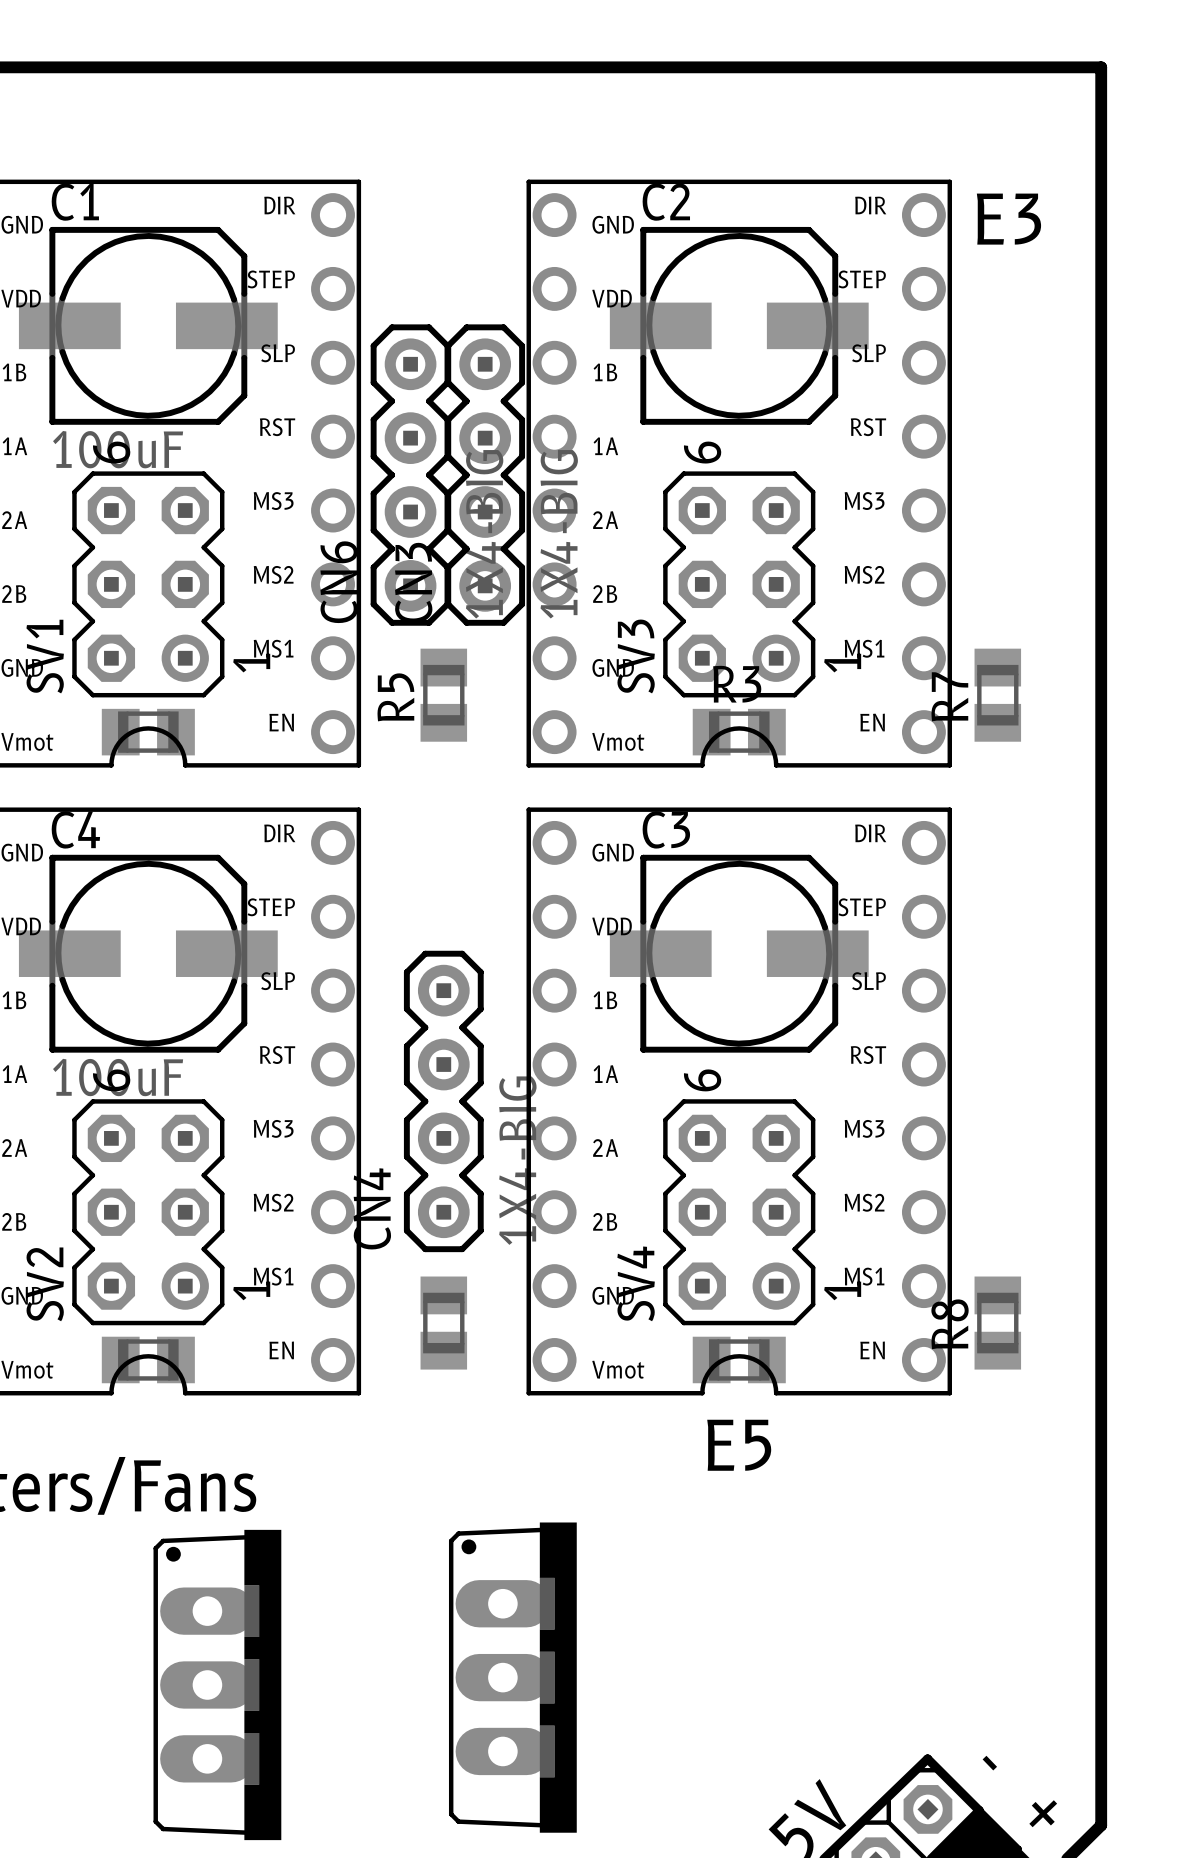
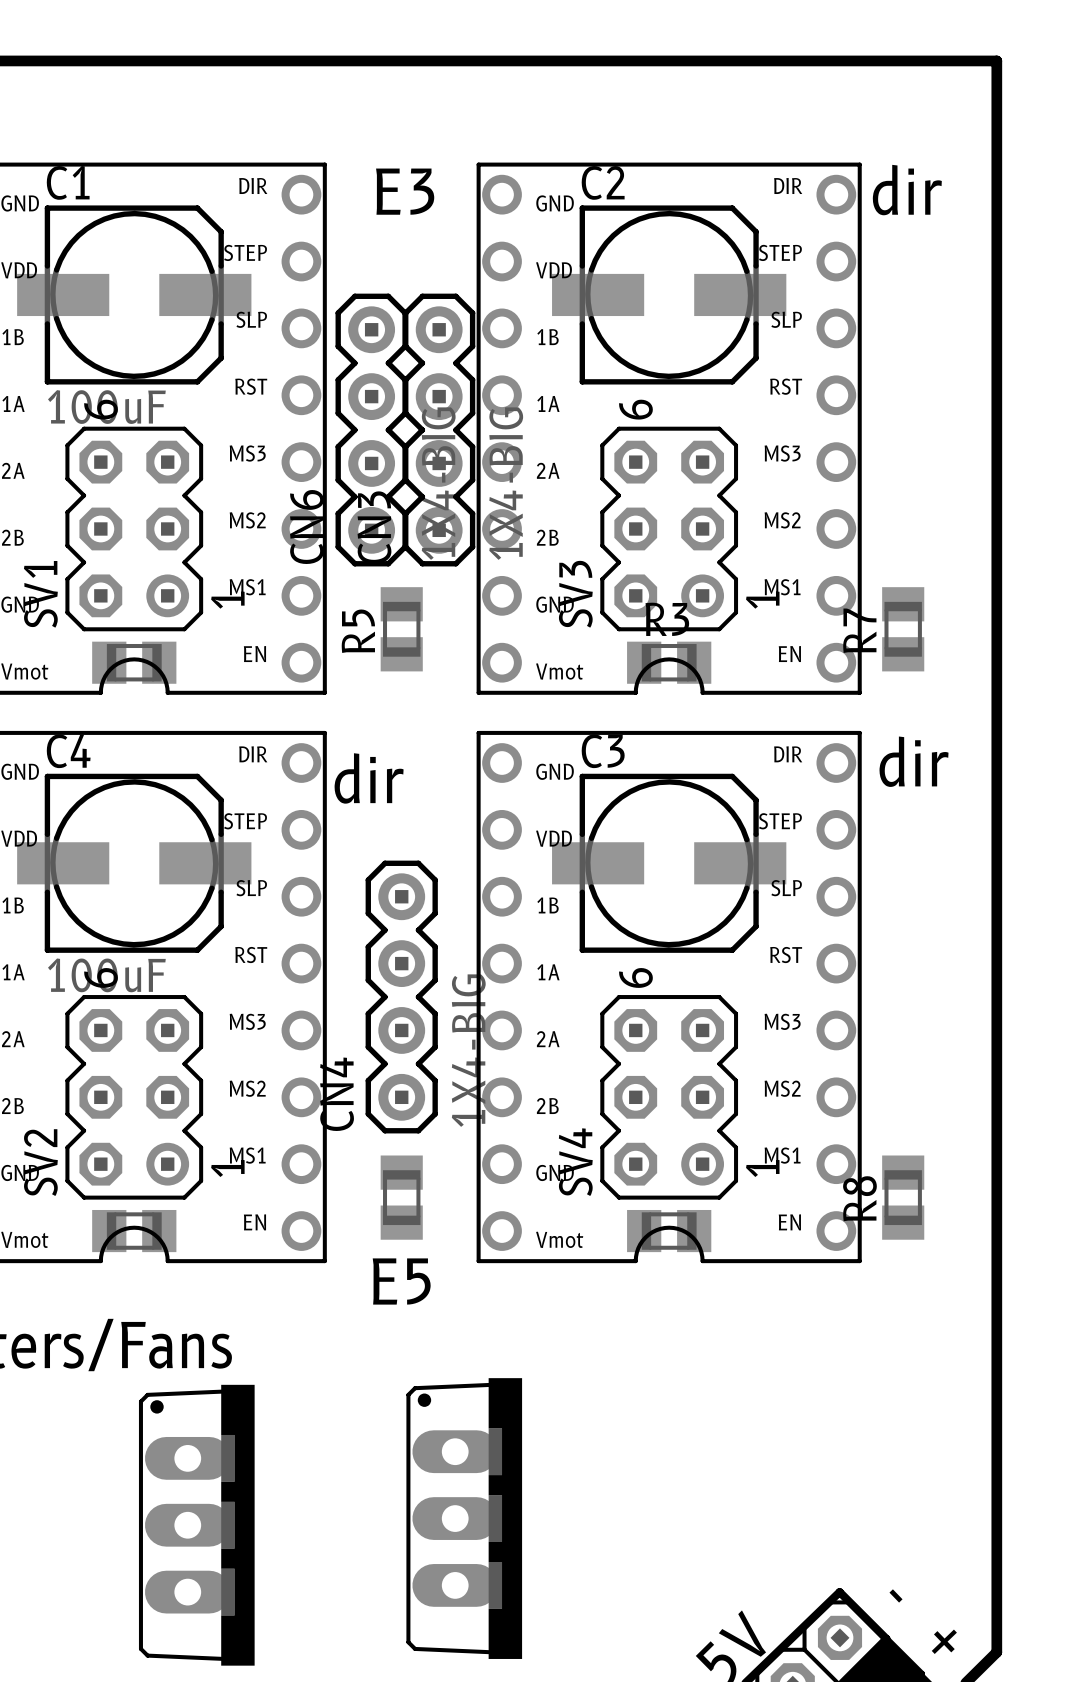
text: none -> E3 (405, 191)
text: E3 (1008, 219) -> dir (907, 190)
text: none -> dir (914, 761)
text: none -> dir (369, 778)
text position: E5 (739, 1445) -> E5 (401, 1281)

